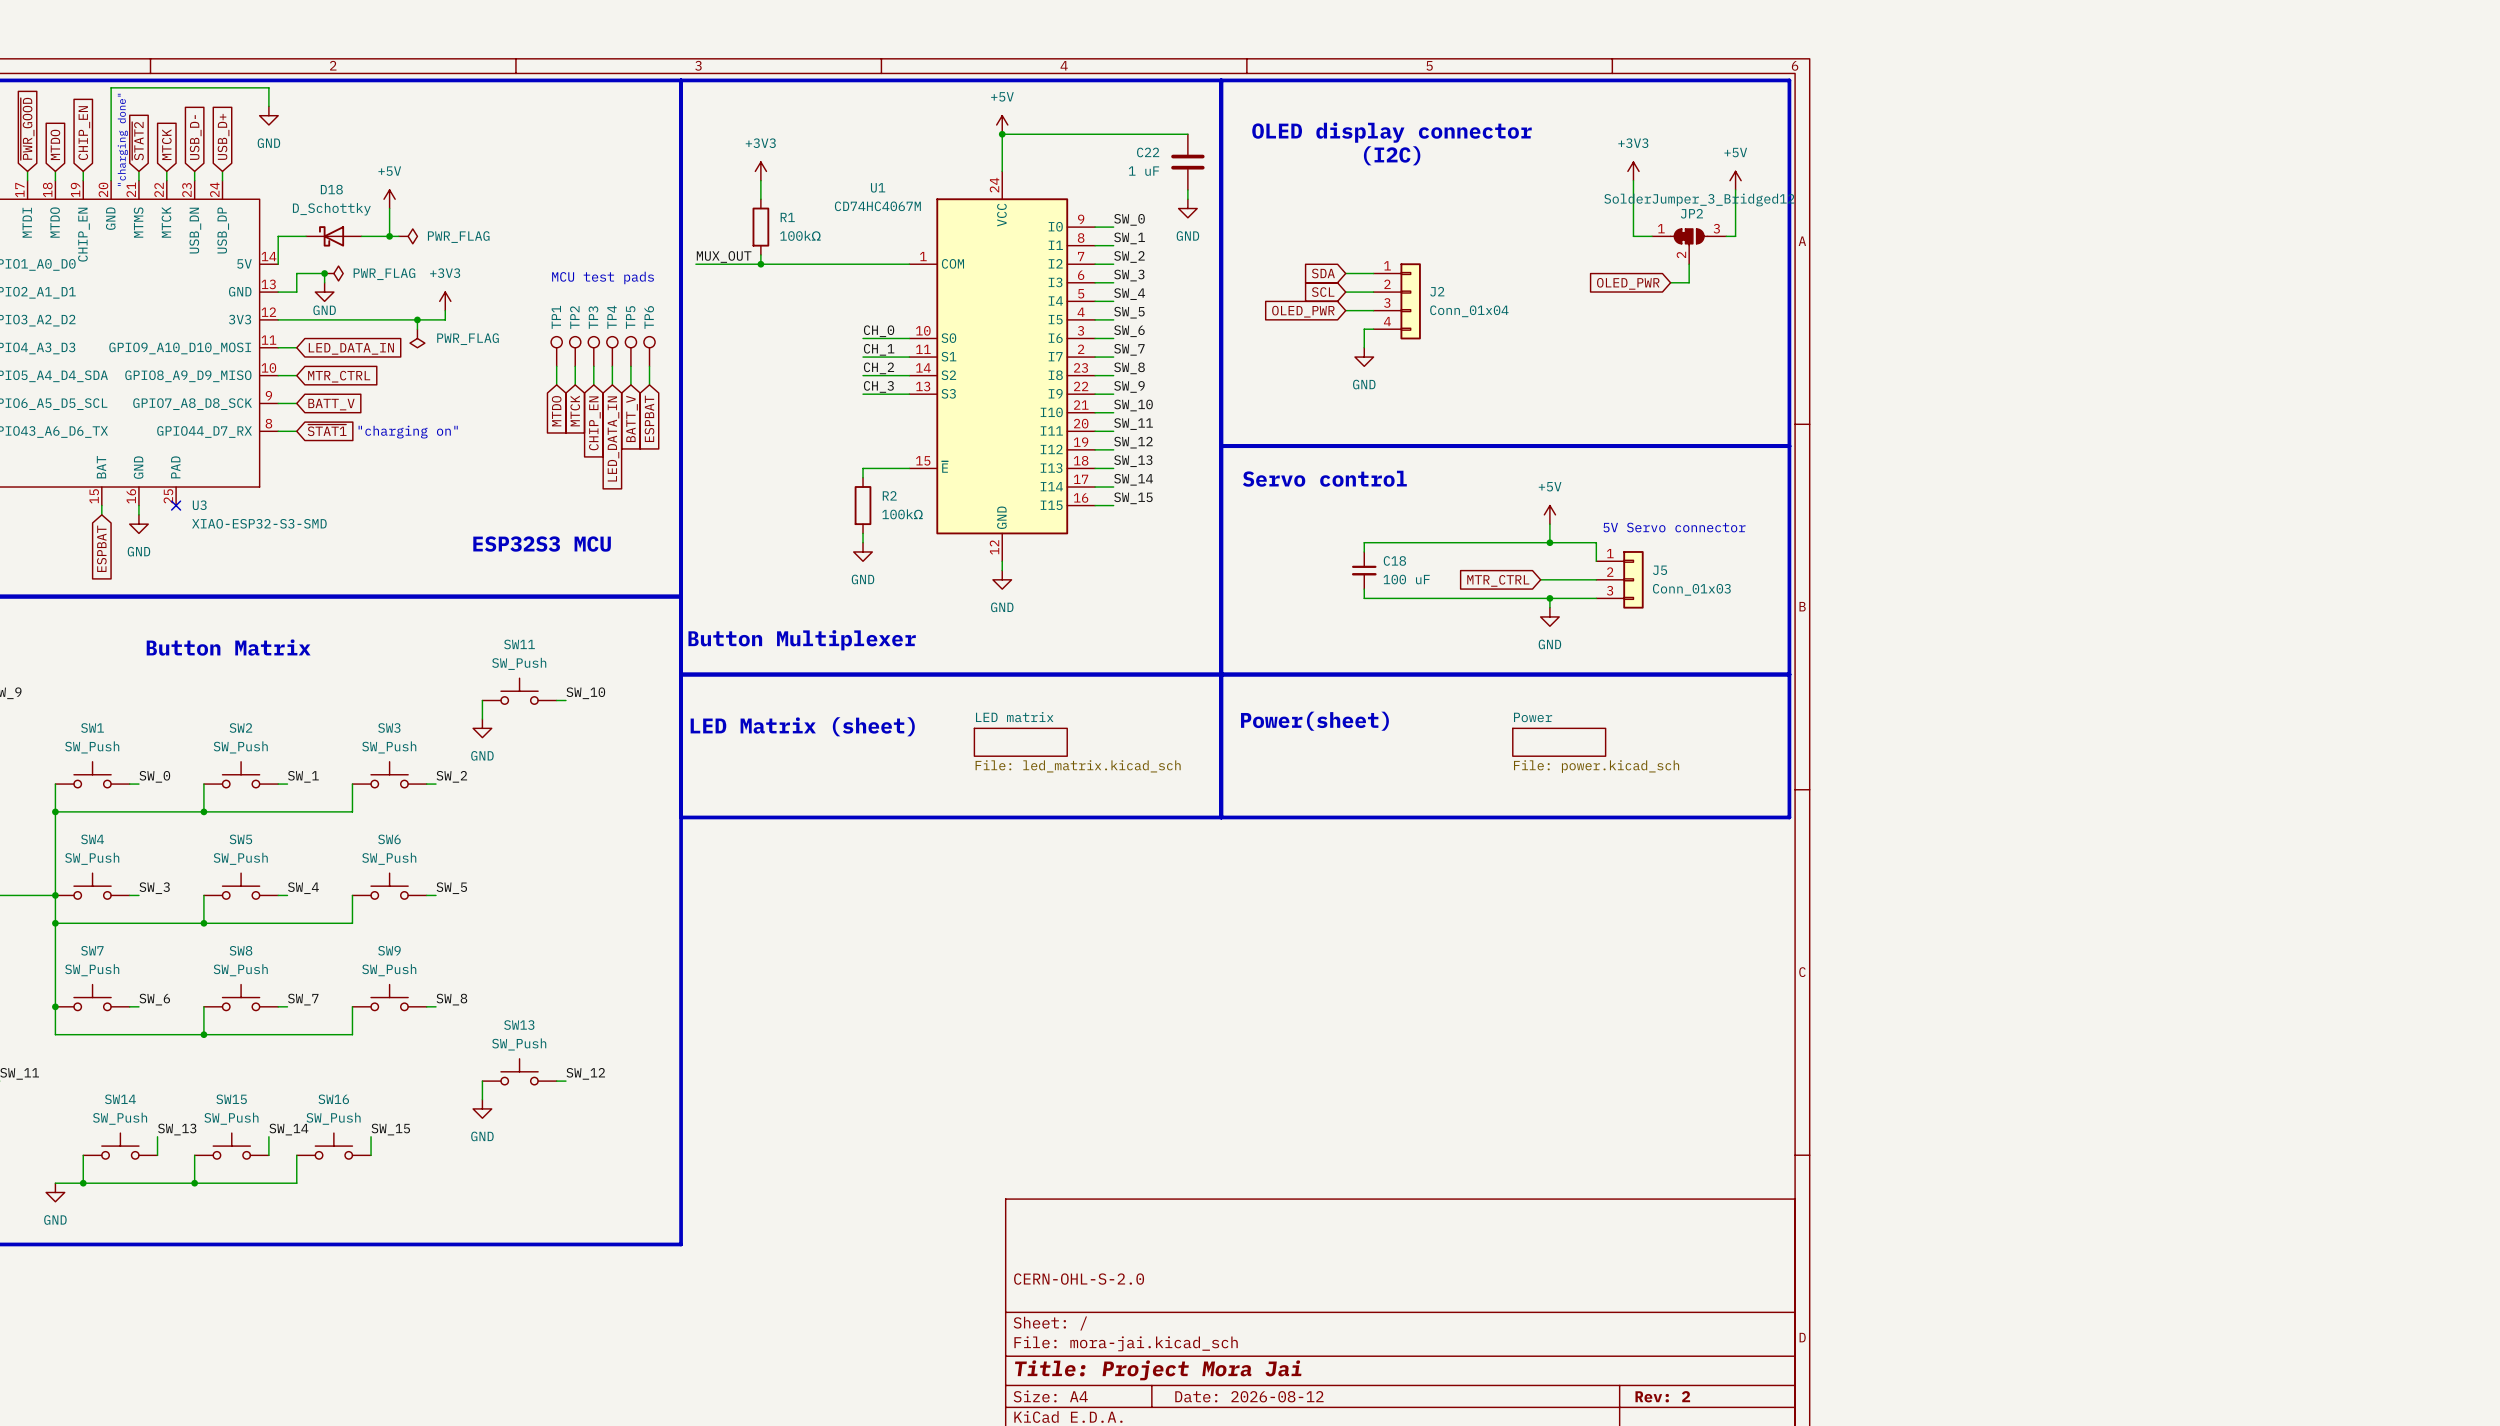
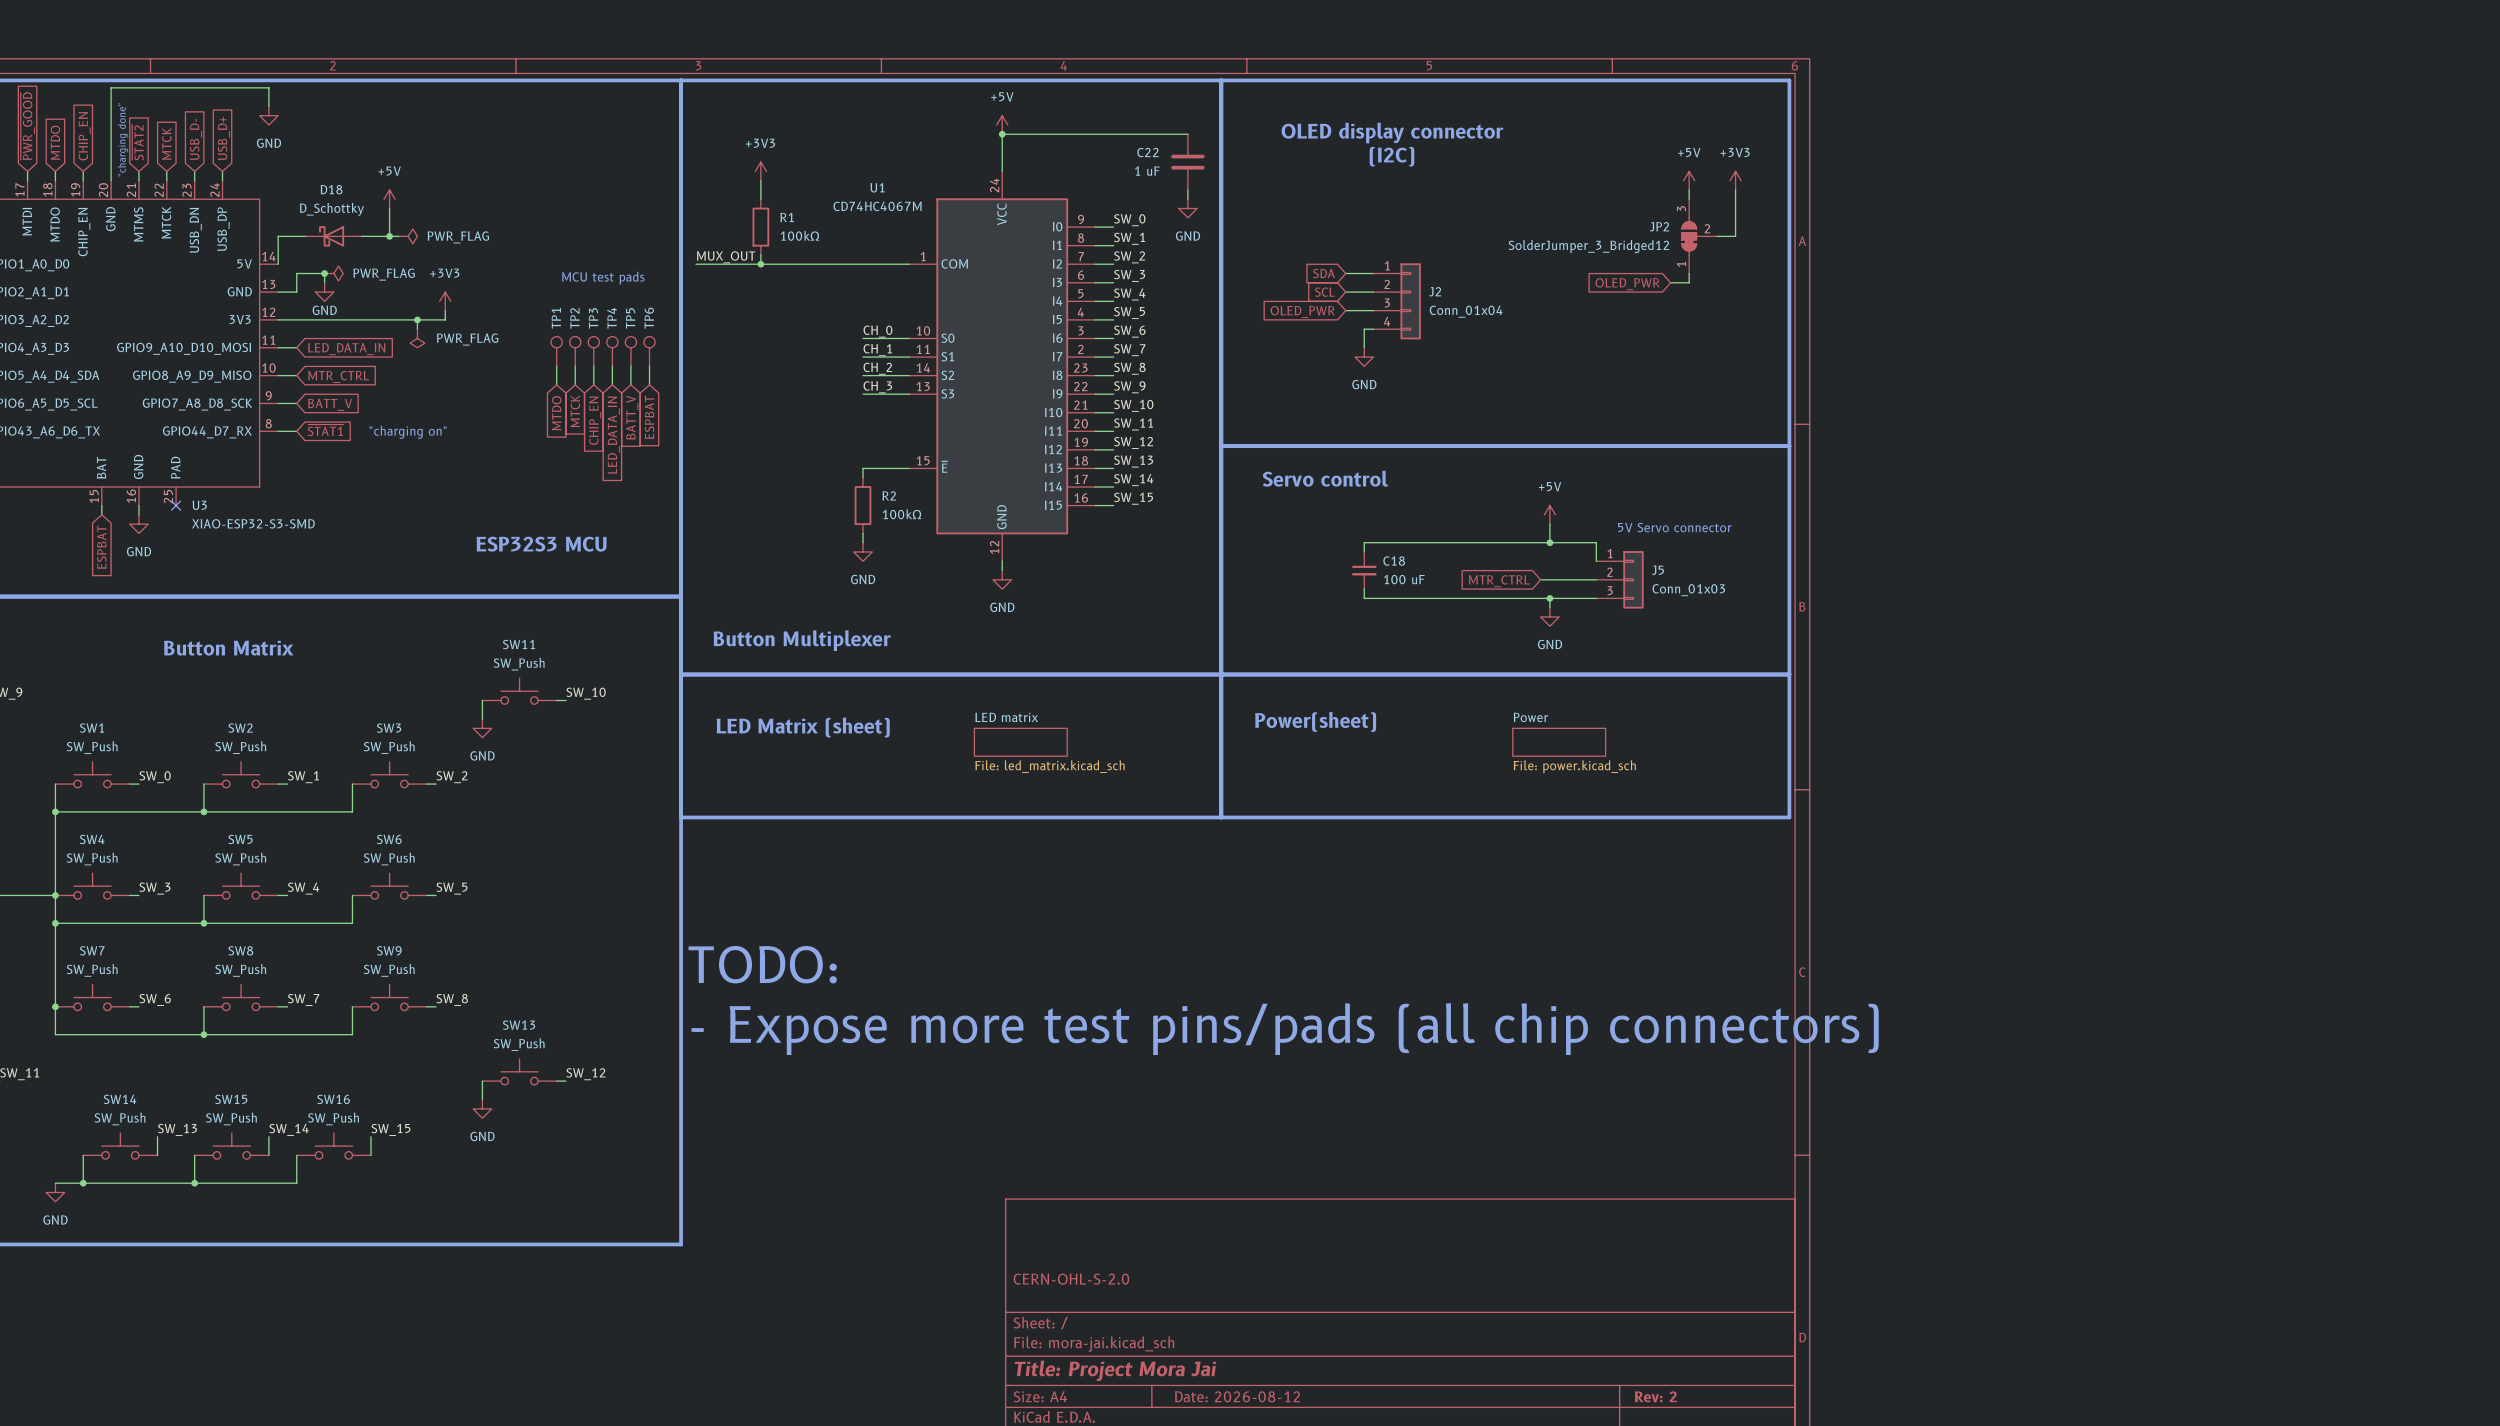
power symbol: +3V3 (1633, 171) -> none
wire: (1633, 180) (1633, 236) (1652, 236) -> none
power symbol: none -> +5V (1689, 180)
power symbol: +5V (1735, 180) -> +3V3 (1735, 180)
JP2 value position: SolderJumper_3_Bridged12 (1699, 199) -> SolderJumper_3_Bridged12 (1588, 246)
JP2 rotation: 0° (1689, 237) -> 90° counterclockwise (1690, 236)
text: none -> TODO: (762, 964)
text: none -> - Expose more test pins/pads (all chip connectors) (1285, 1029)

